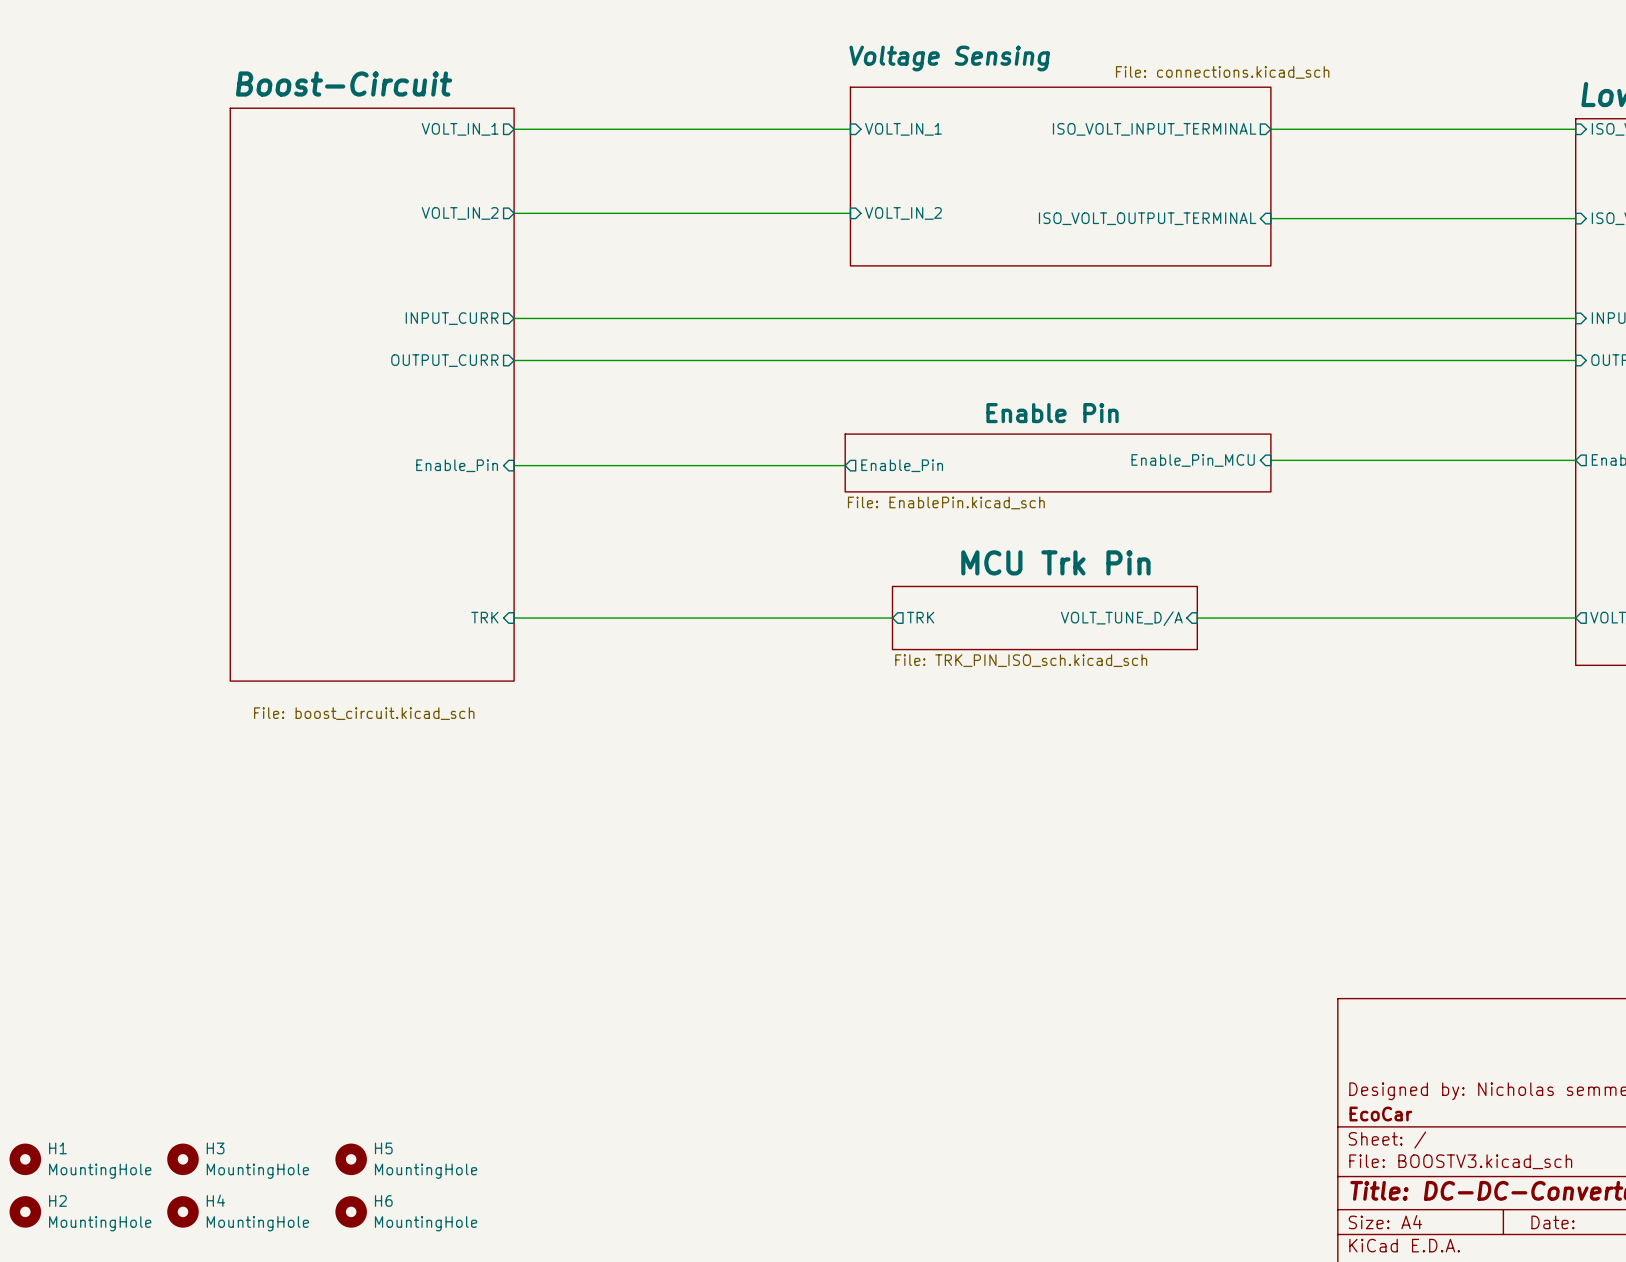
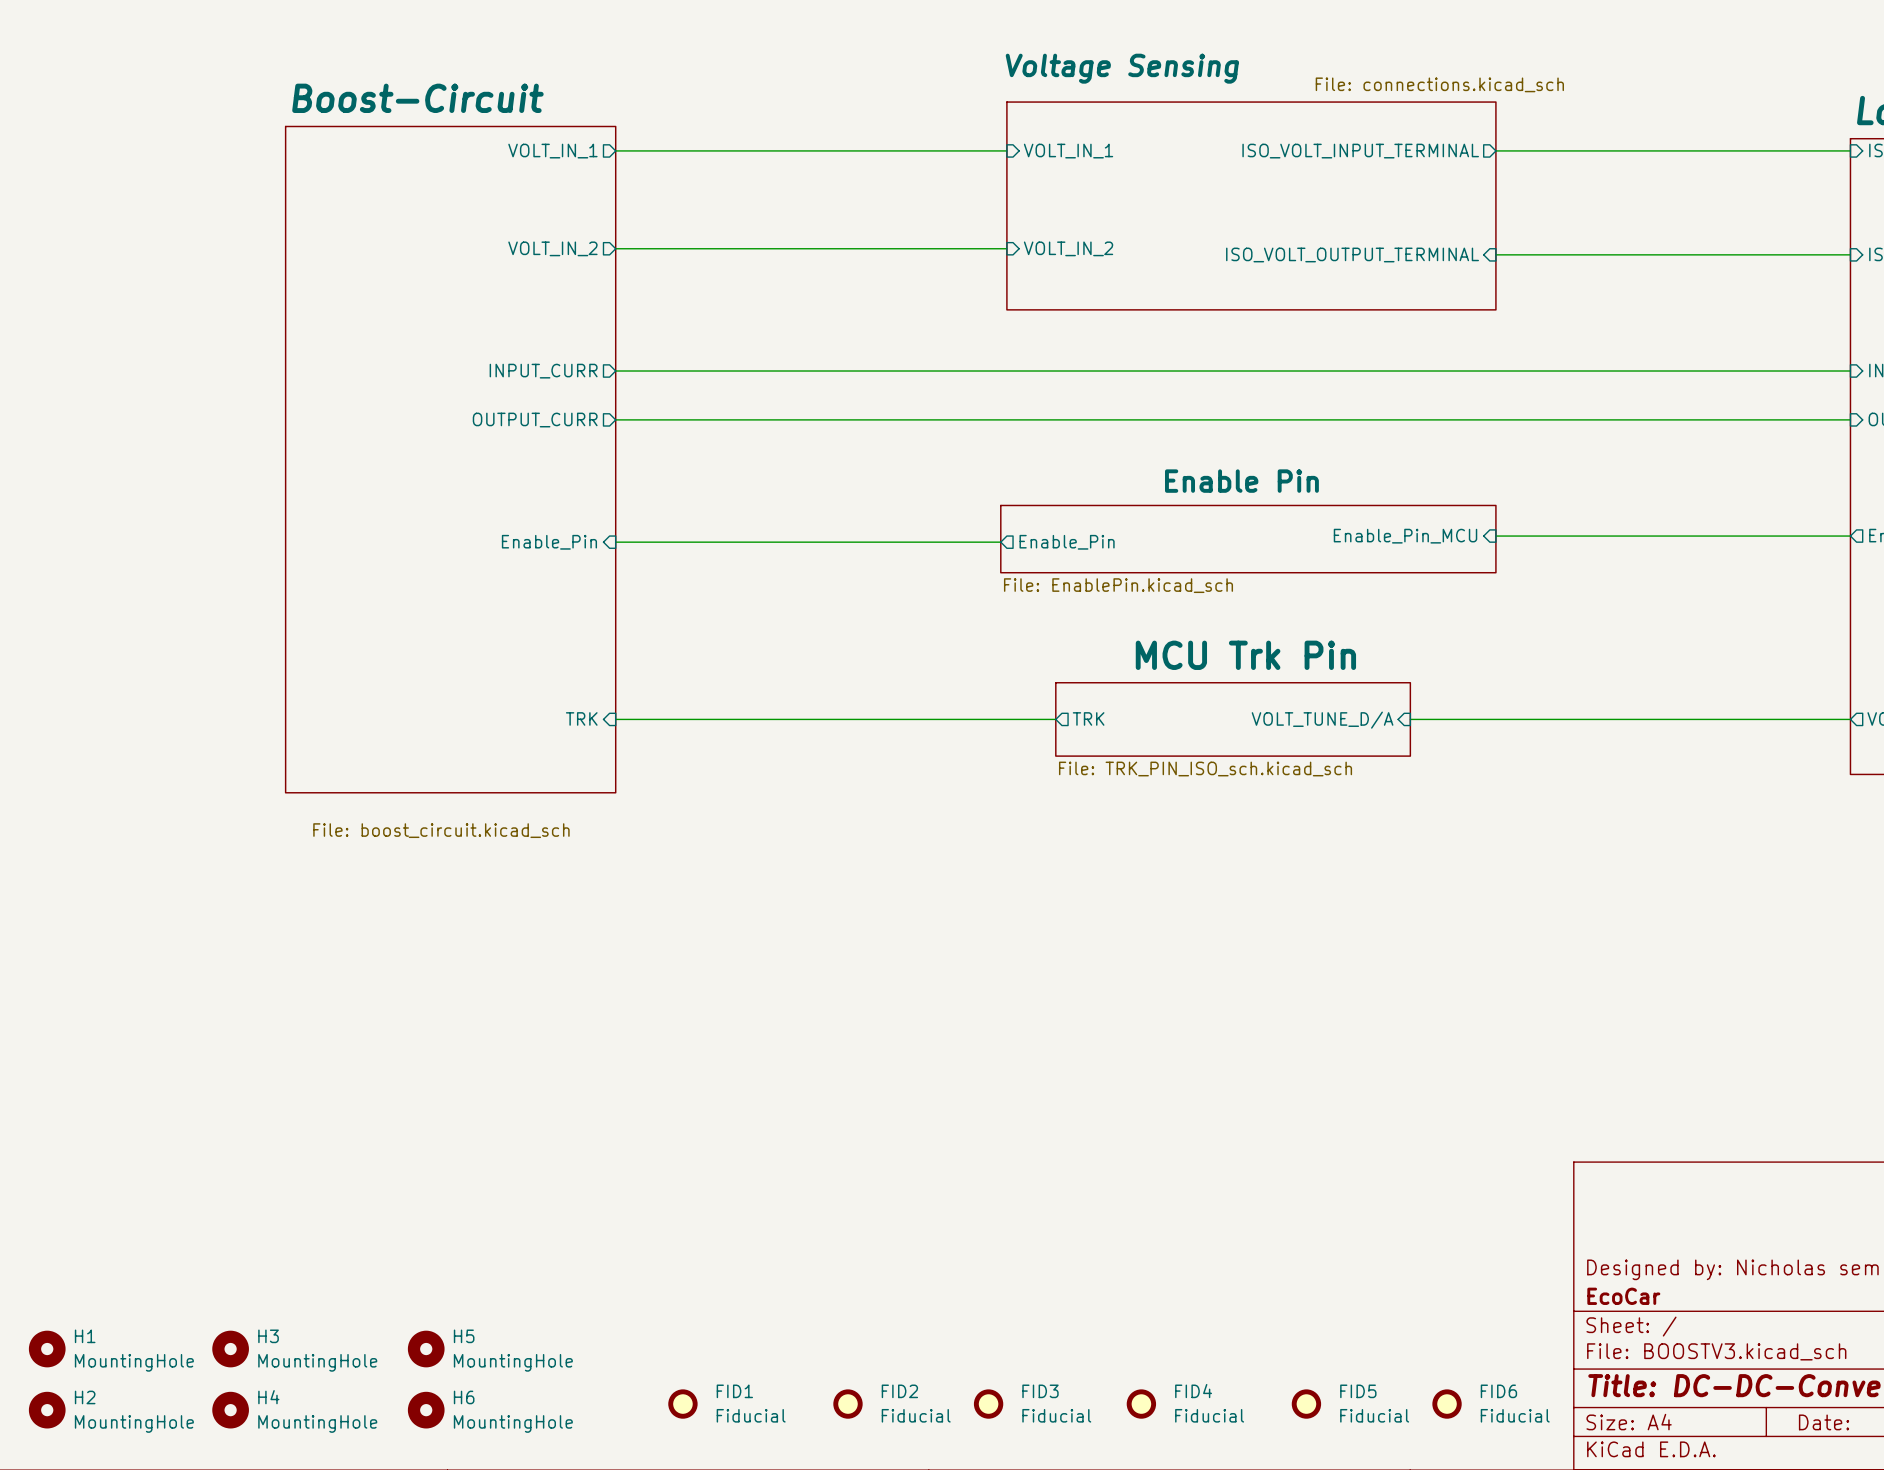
FID1: none -> Fiducial (682, 1404)
FID2: none -> Fiducial (847, 1404)
FID3: none -> Fiducial (988, 1404)
FID4: none -> Fiducial (1141, 1404)
FID5: none -> Fiducial (1306, 1404)
FID6: none -> Fiducial (1447, 1404)

